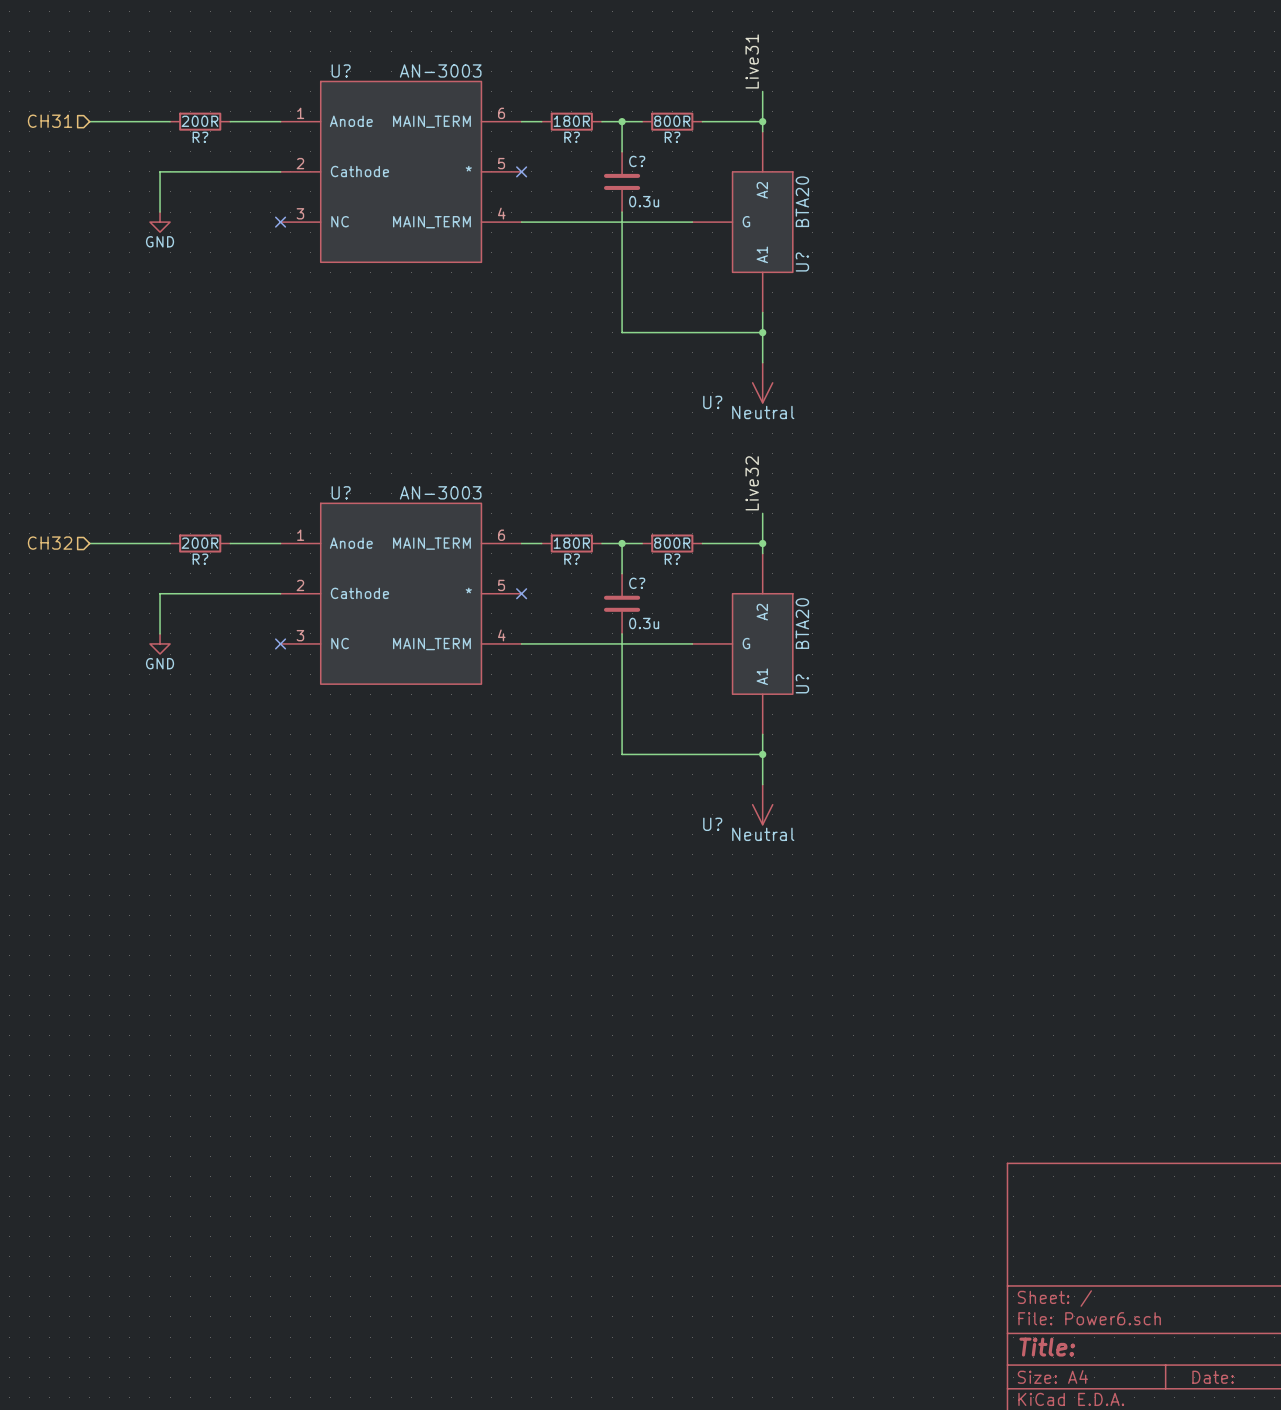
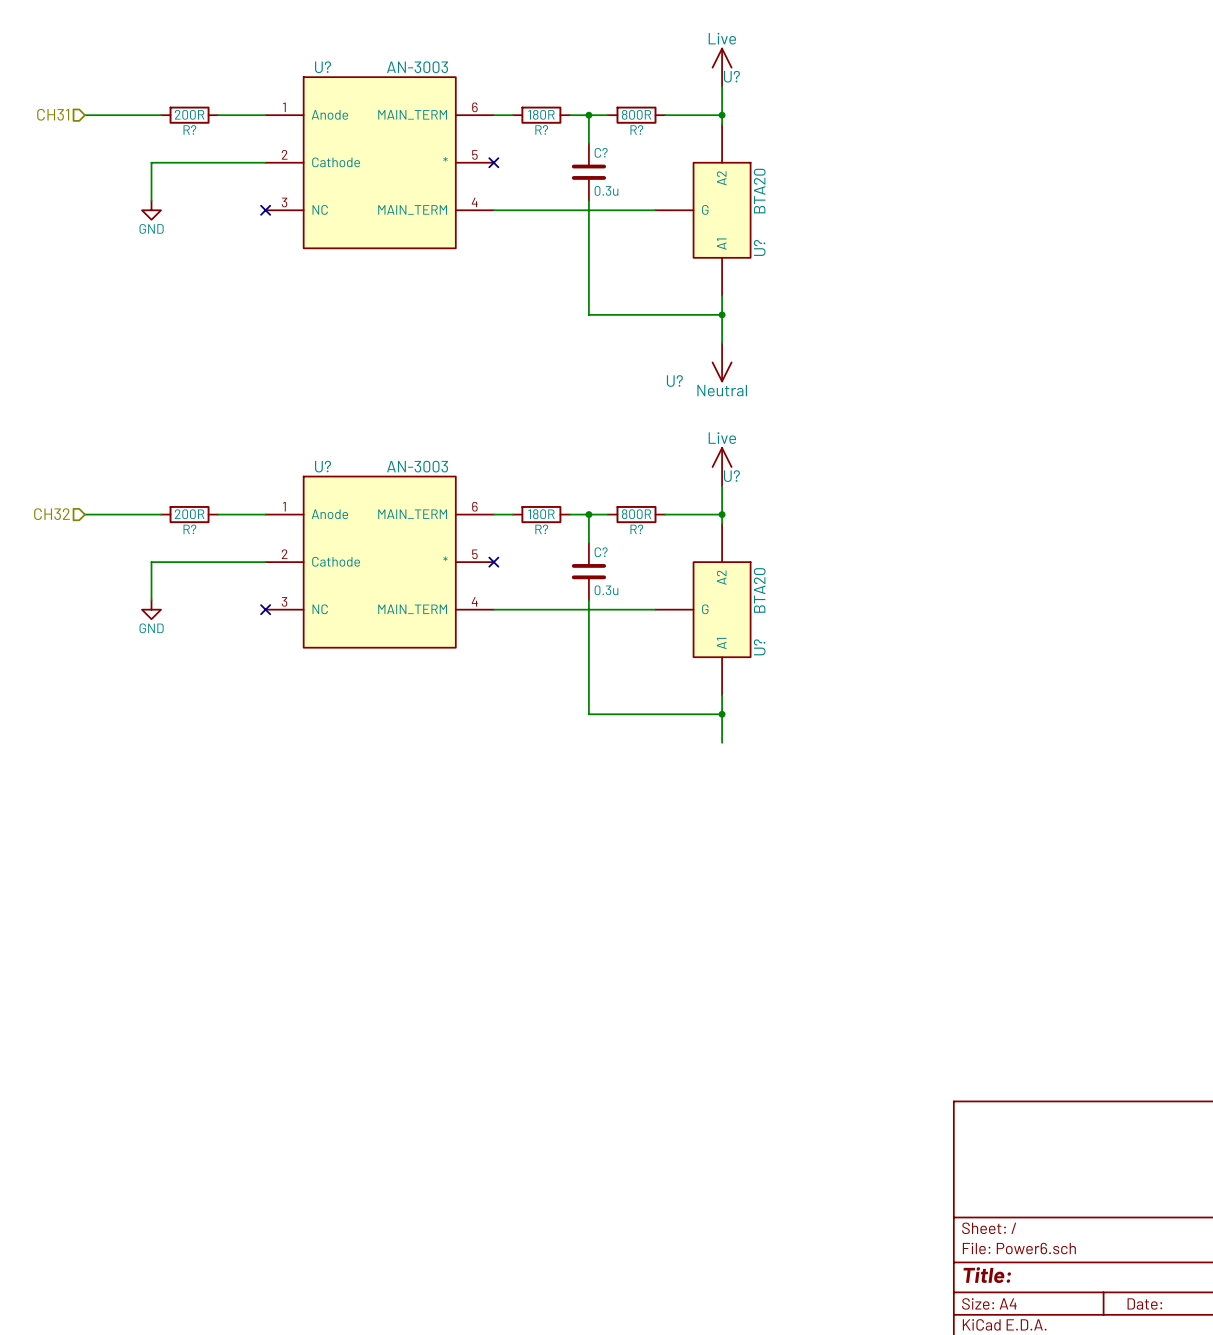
label: Live31 (752, 61) -> none
U?: none -> Live (722, 67)
label: Live32 (752, 483) -> none
U?: none -> Live (722, 467)
U?: Neutral (762, 804) -> none

